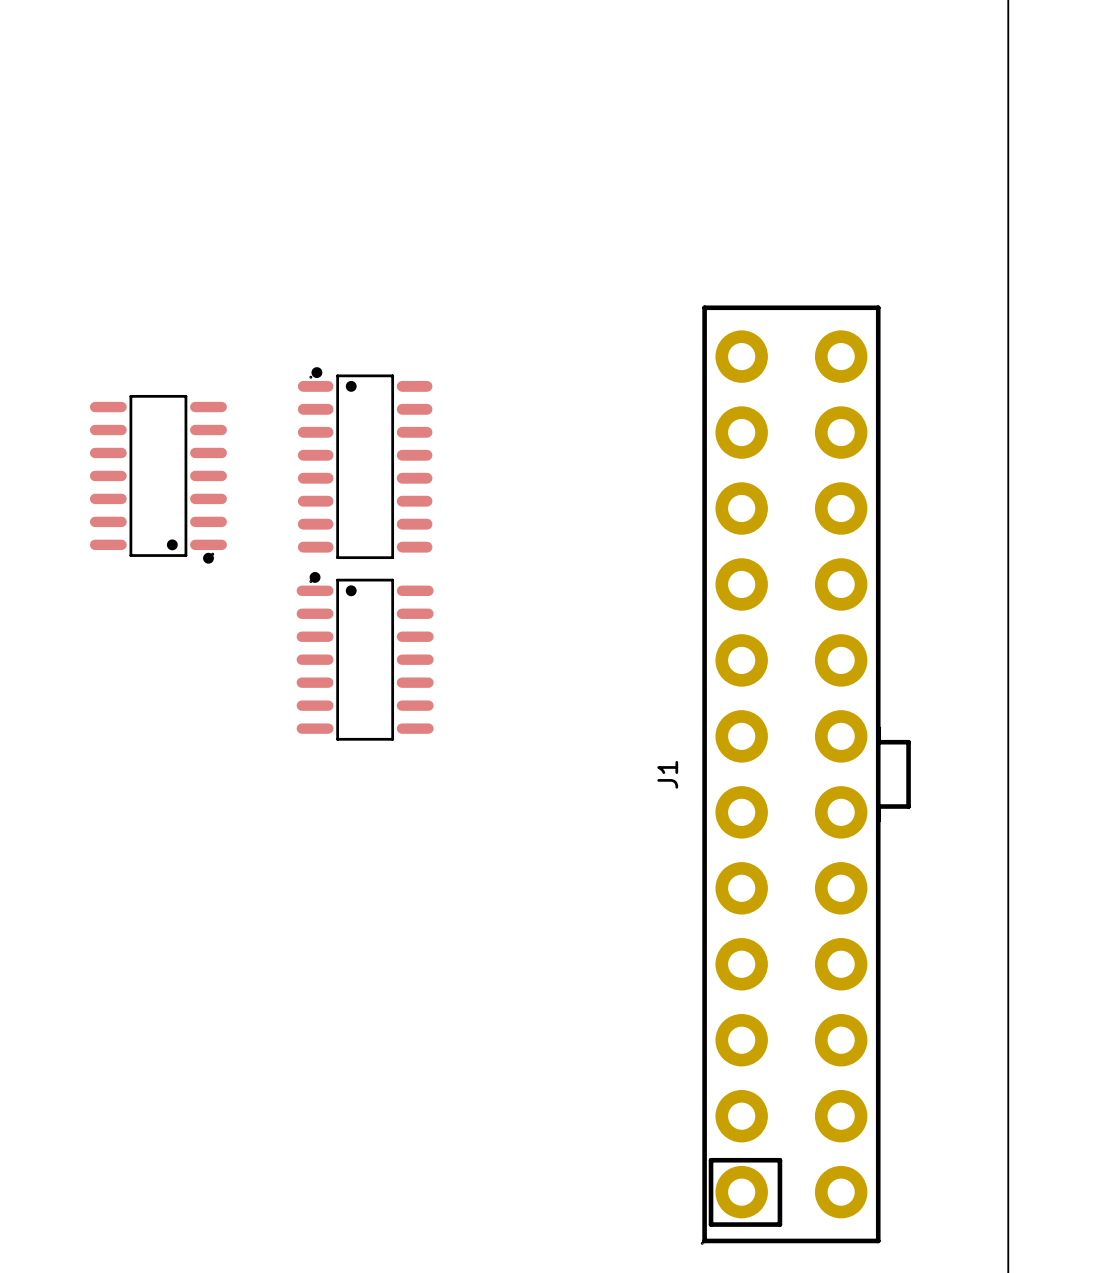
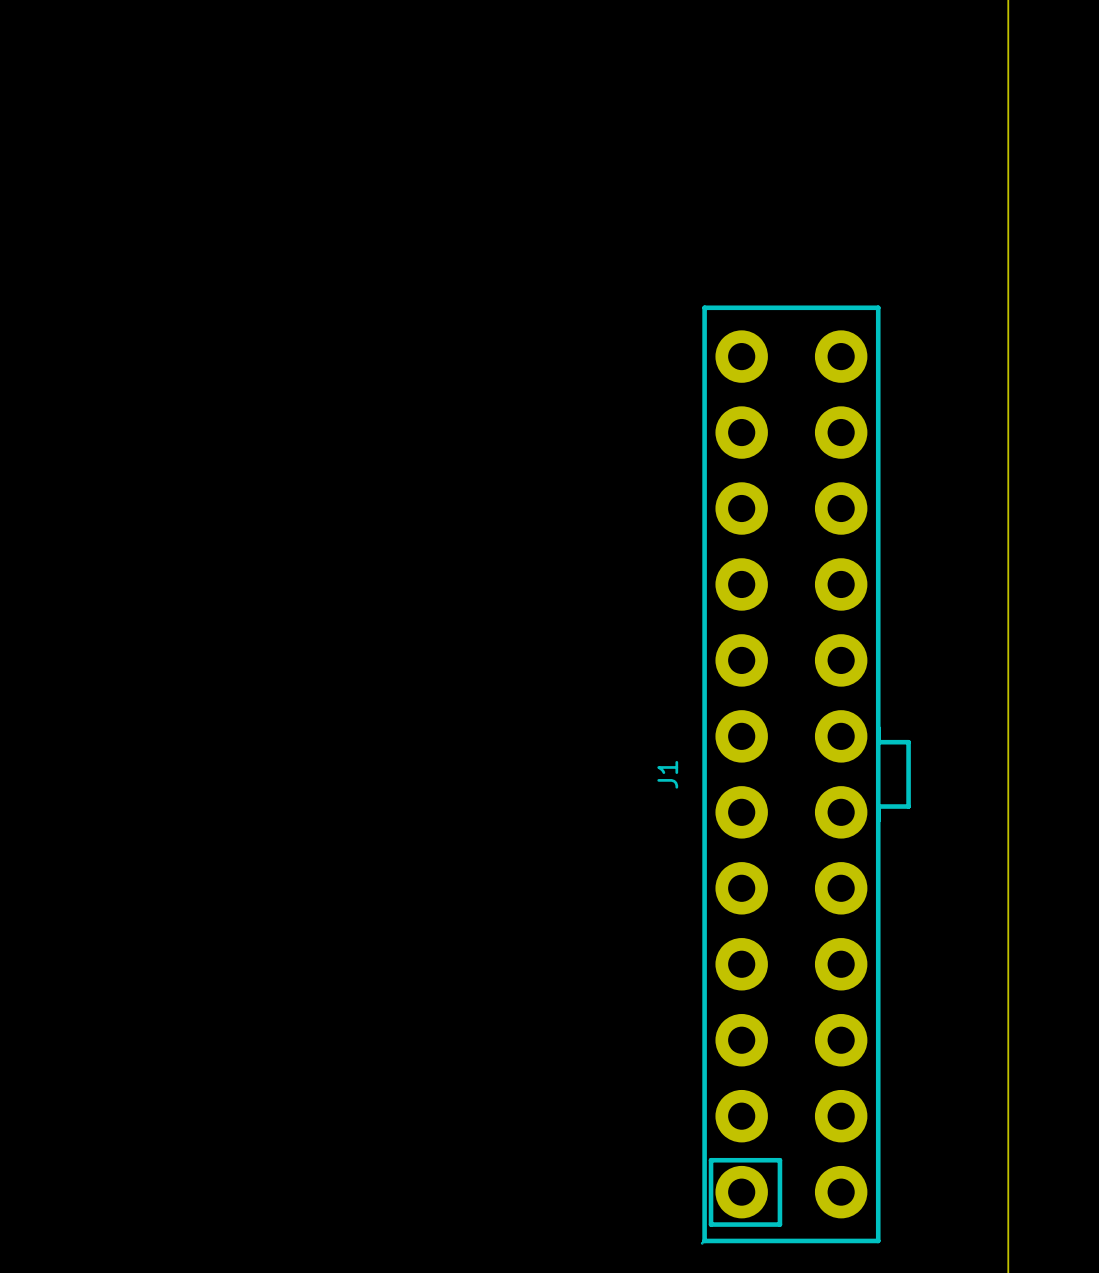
part: (365, 463) -> none
part: (158, 479) -> none
part: (365, 656) -> none

